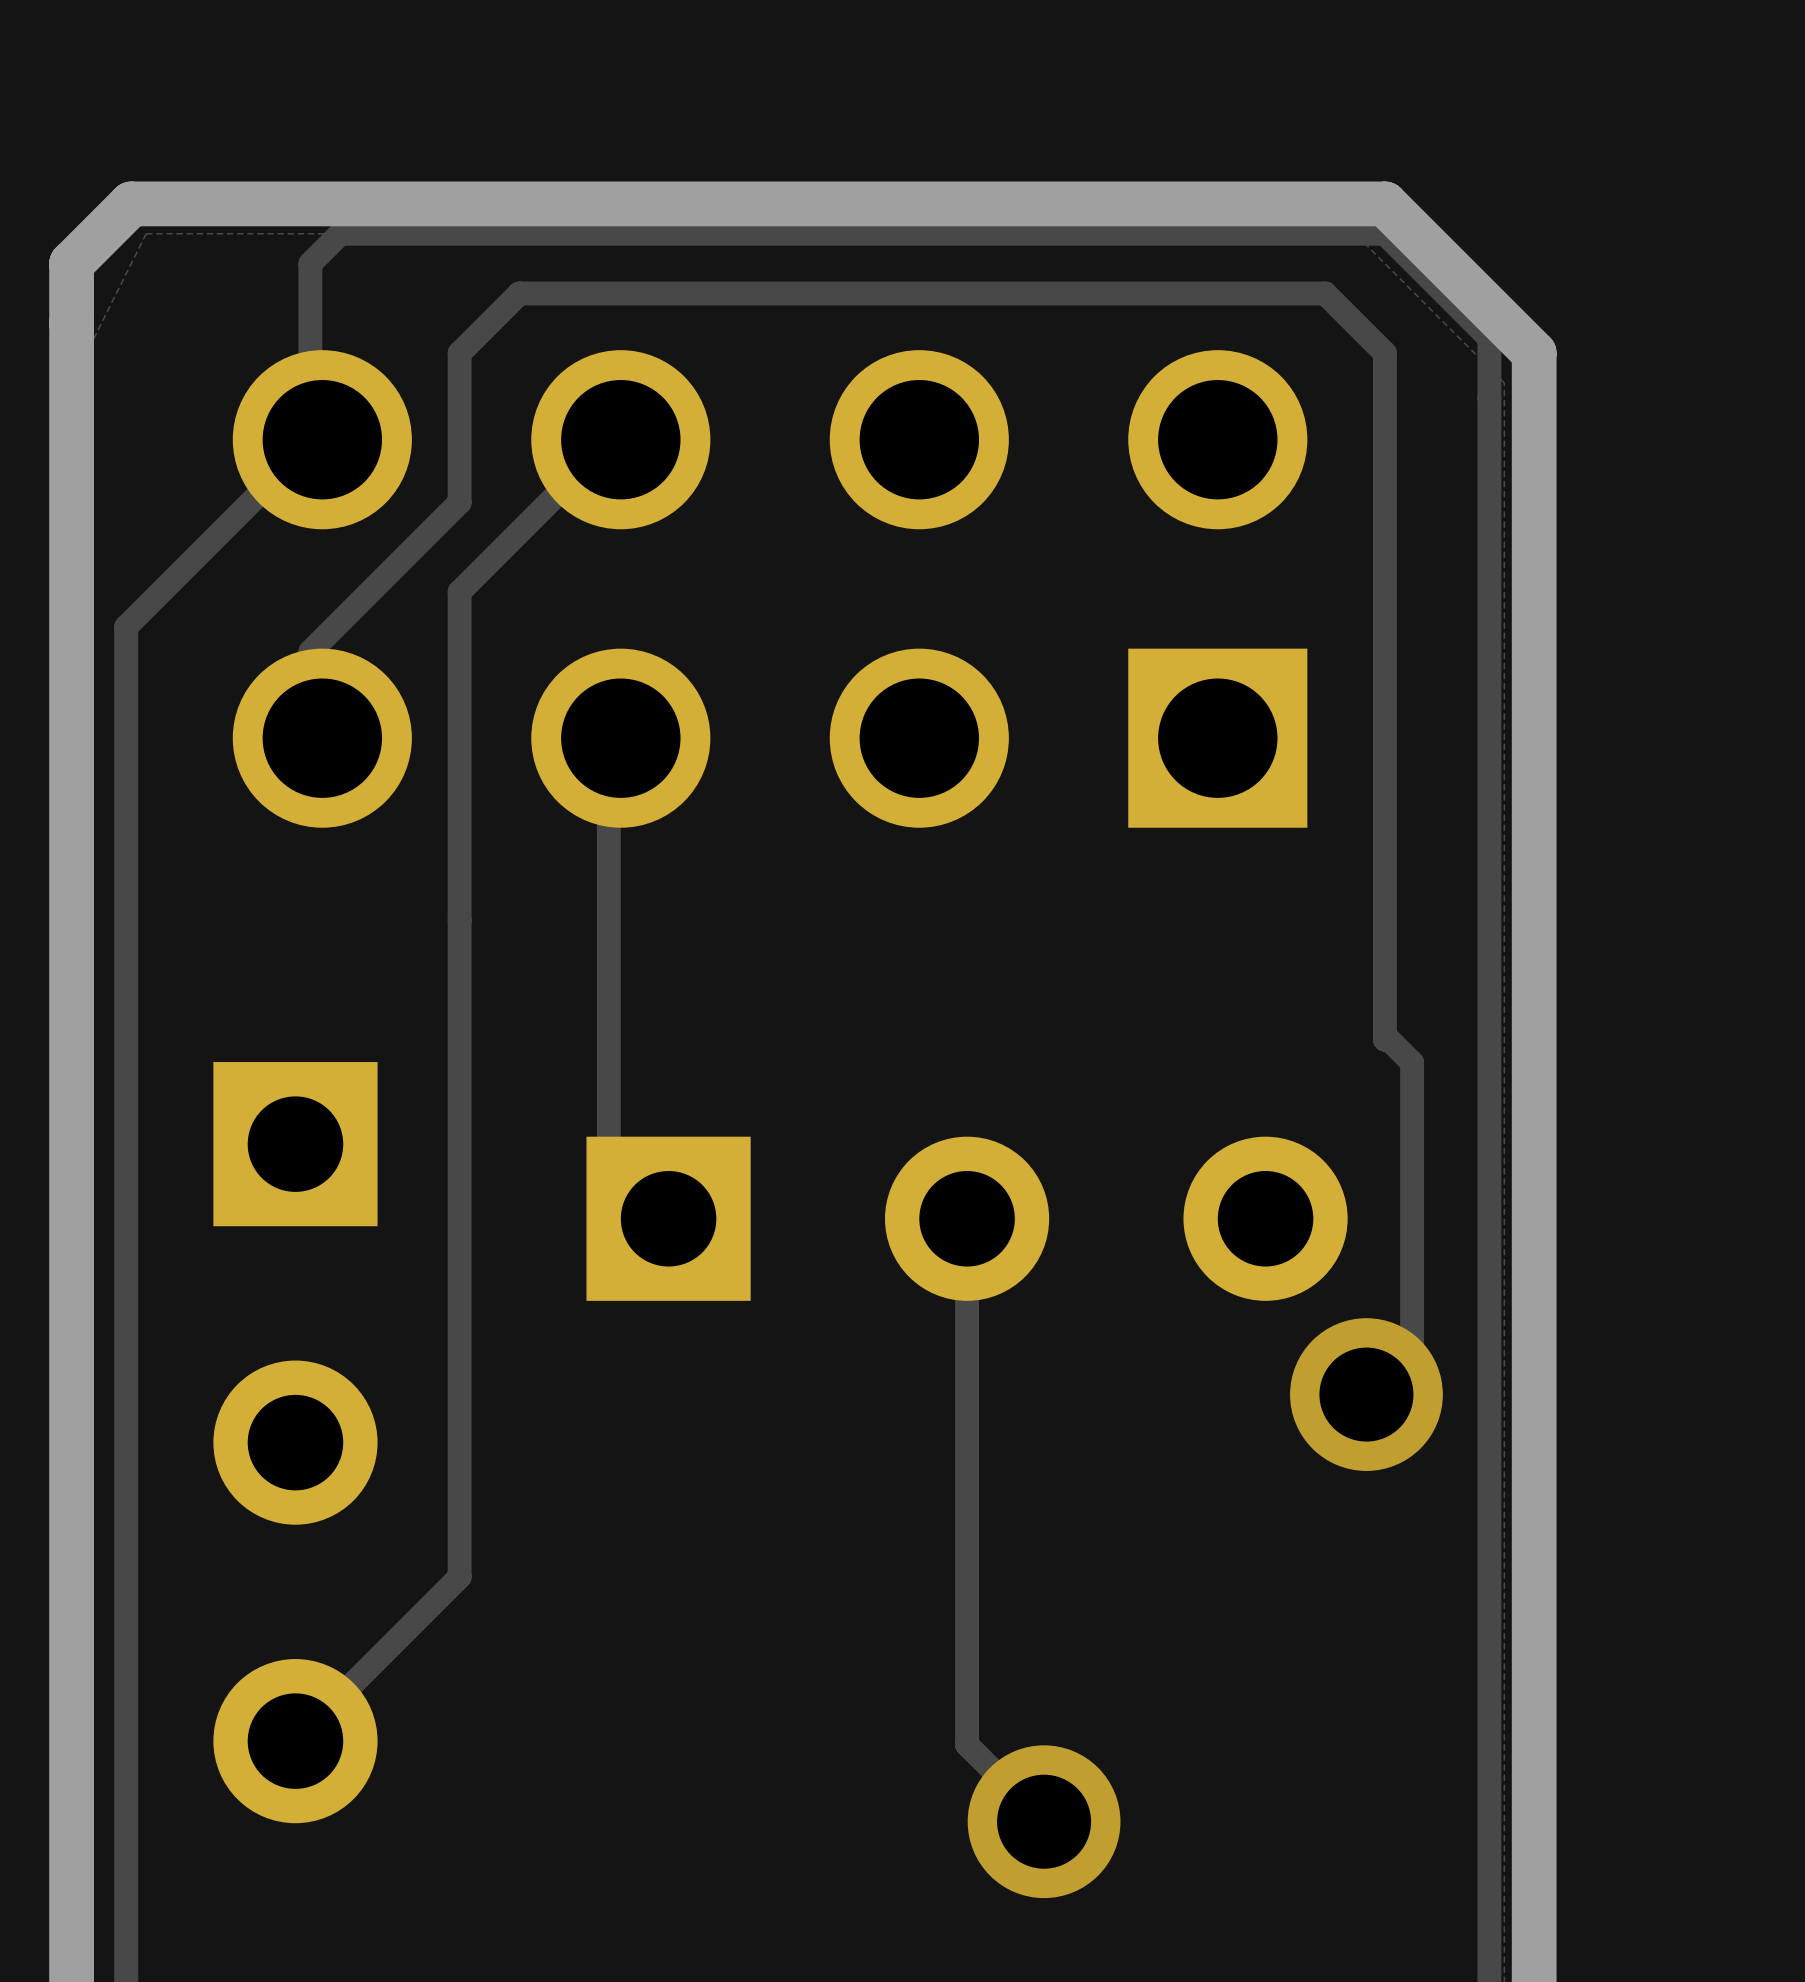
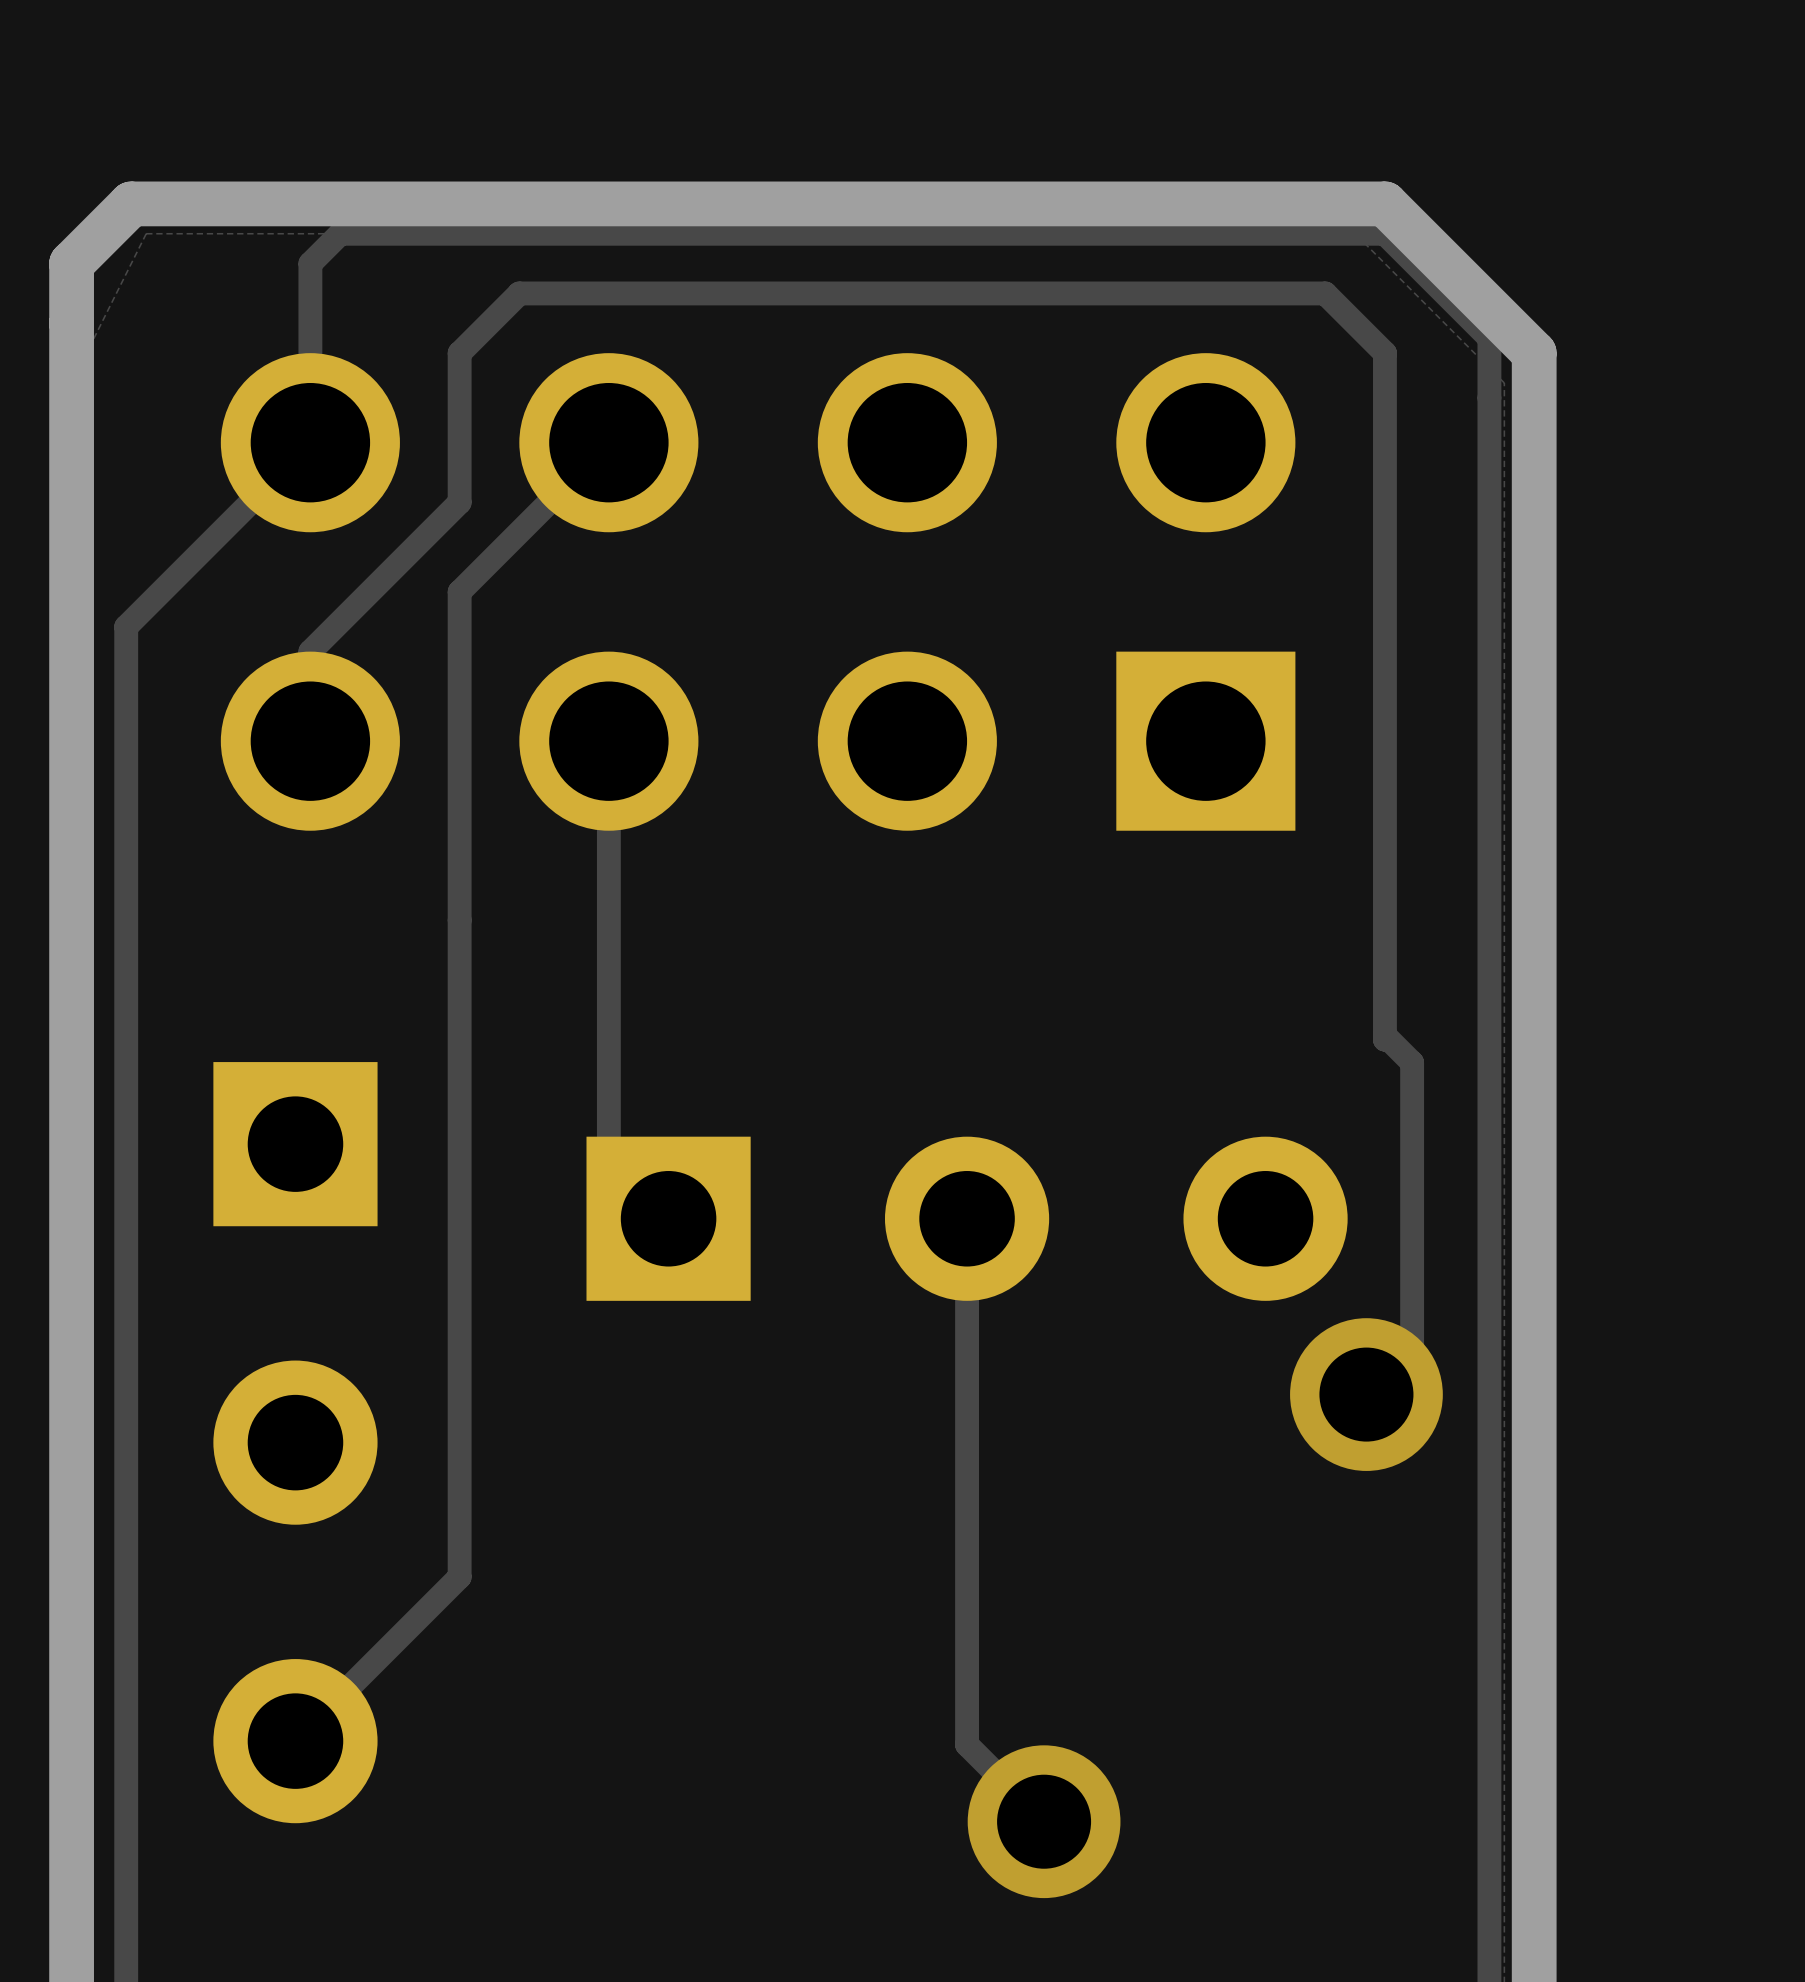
part position: (770, 588) -> (758, 591)

